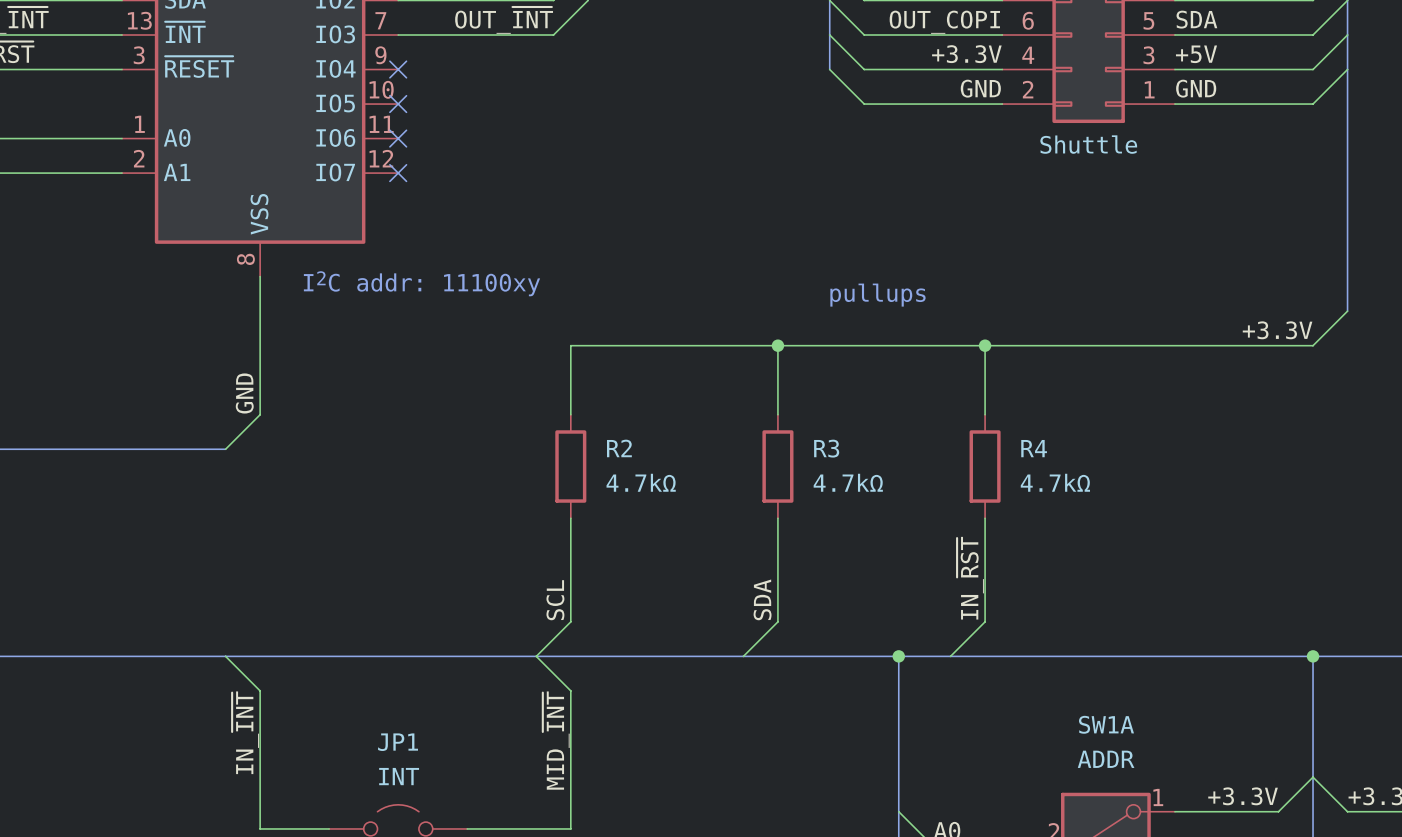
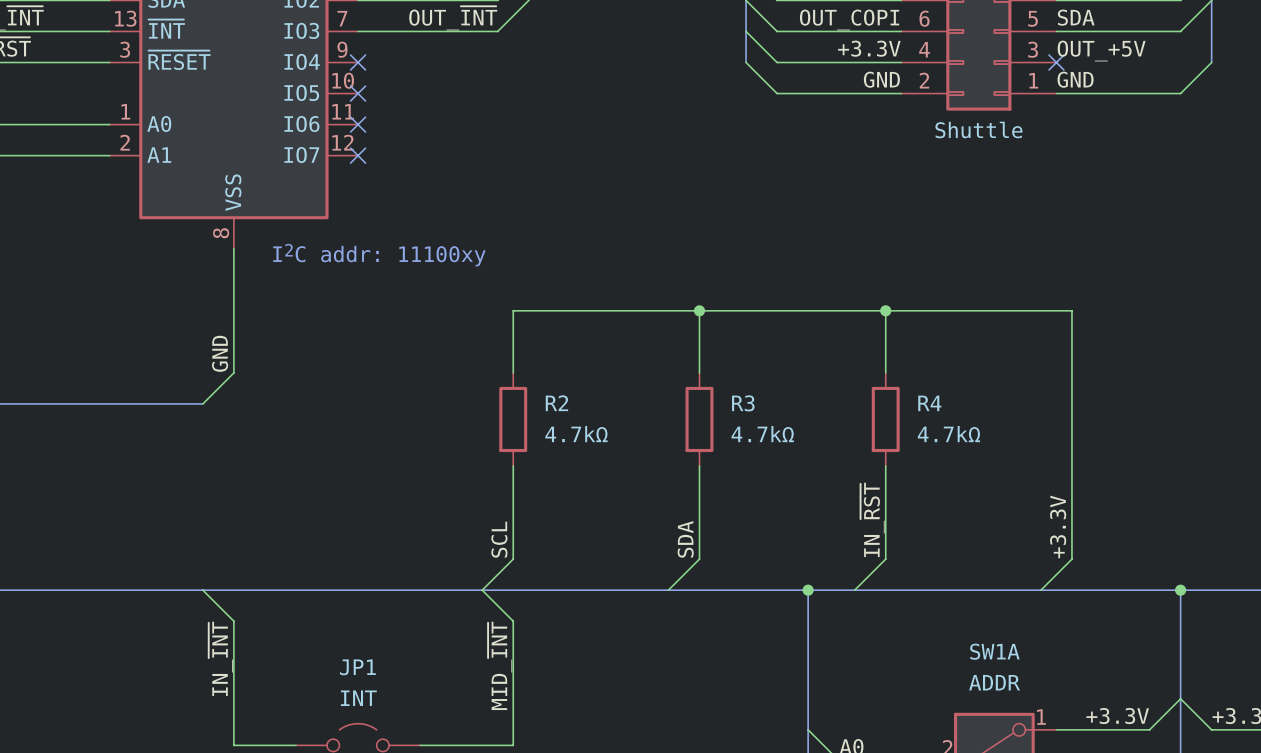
wire: (1347, 35) (1313, 69) (1174, 69) -> none
label: +5V (1196, 54) -> OUT_+5V (1101, 51)
no-connect mark: none -> (1056, 62)
bus: (1347, 69) (1347, 311) -> none
text: pullups (877, 295) -> none
wire: (1347, 311) (1313, 345) (1192, 345) -> (1040, 590) (1071, 559) (1071, 310)
label rotation: 0° (1277, 330) -> 90° counterclockwise (1058, 526)
label position: +3.3V (1277, 330) -> +3.3V (1058, 526)

